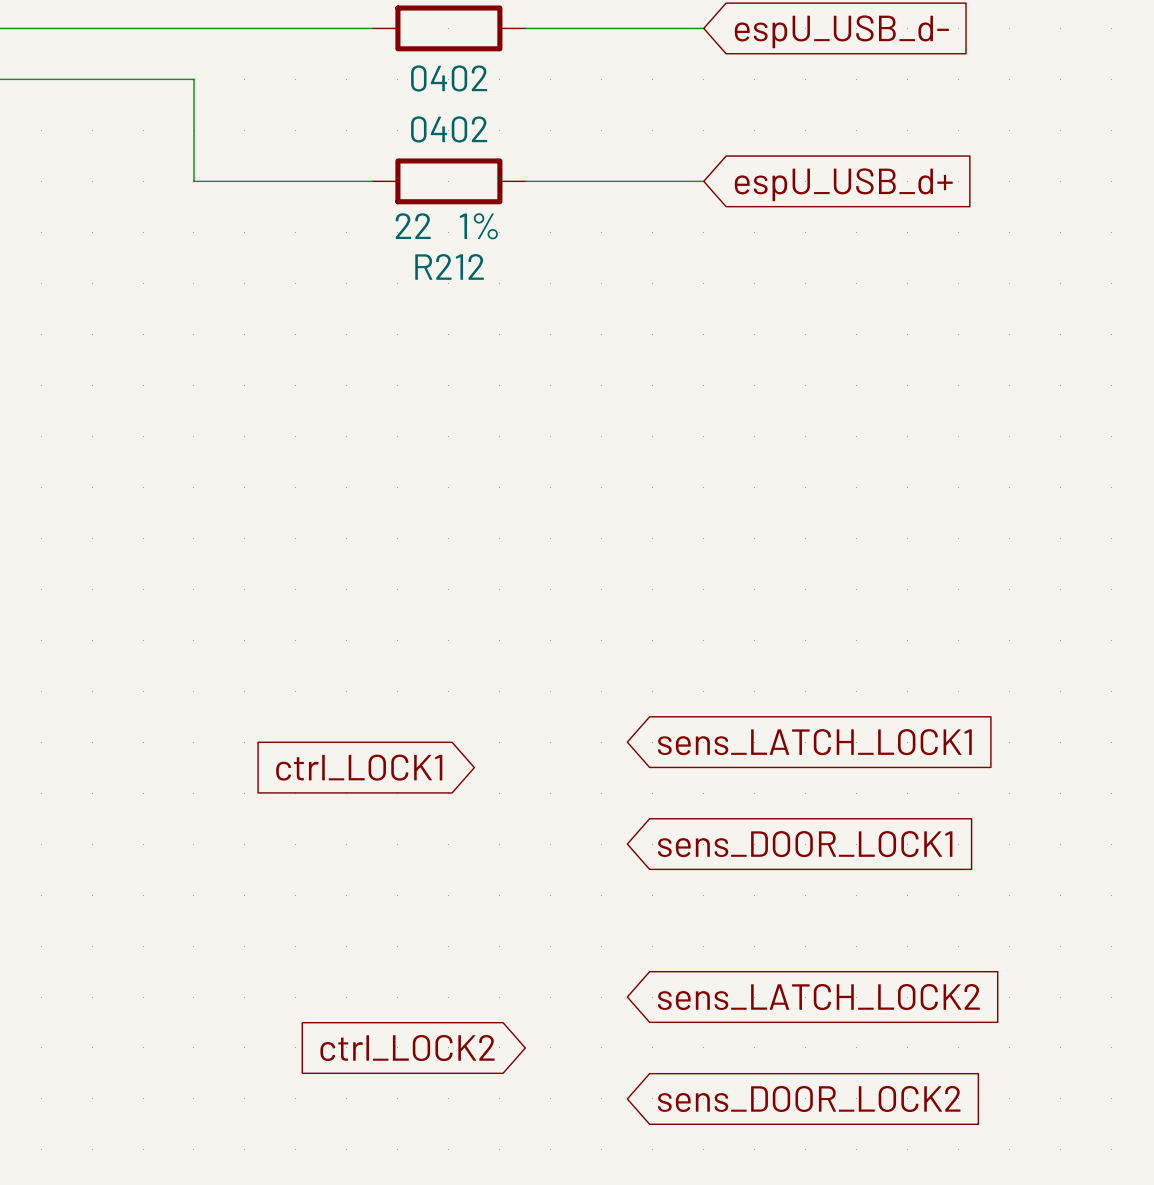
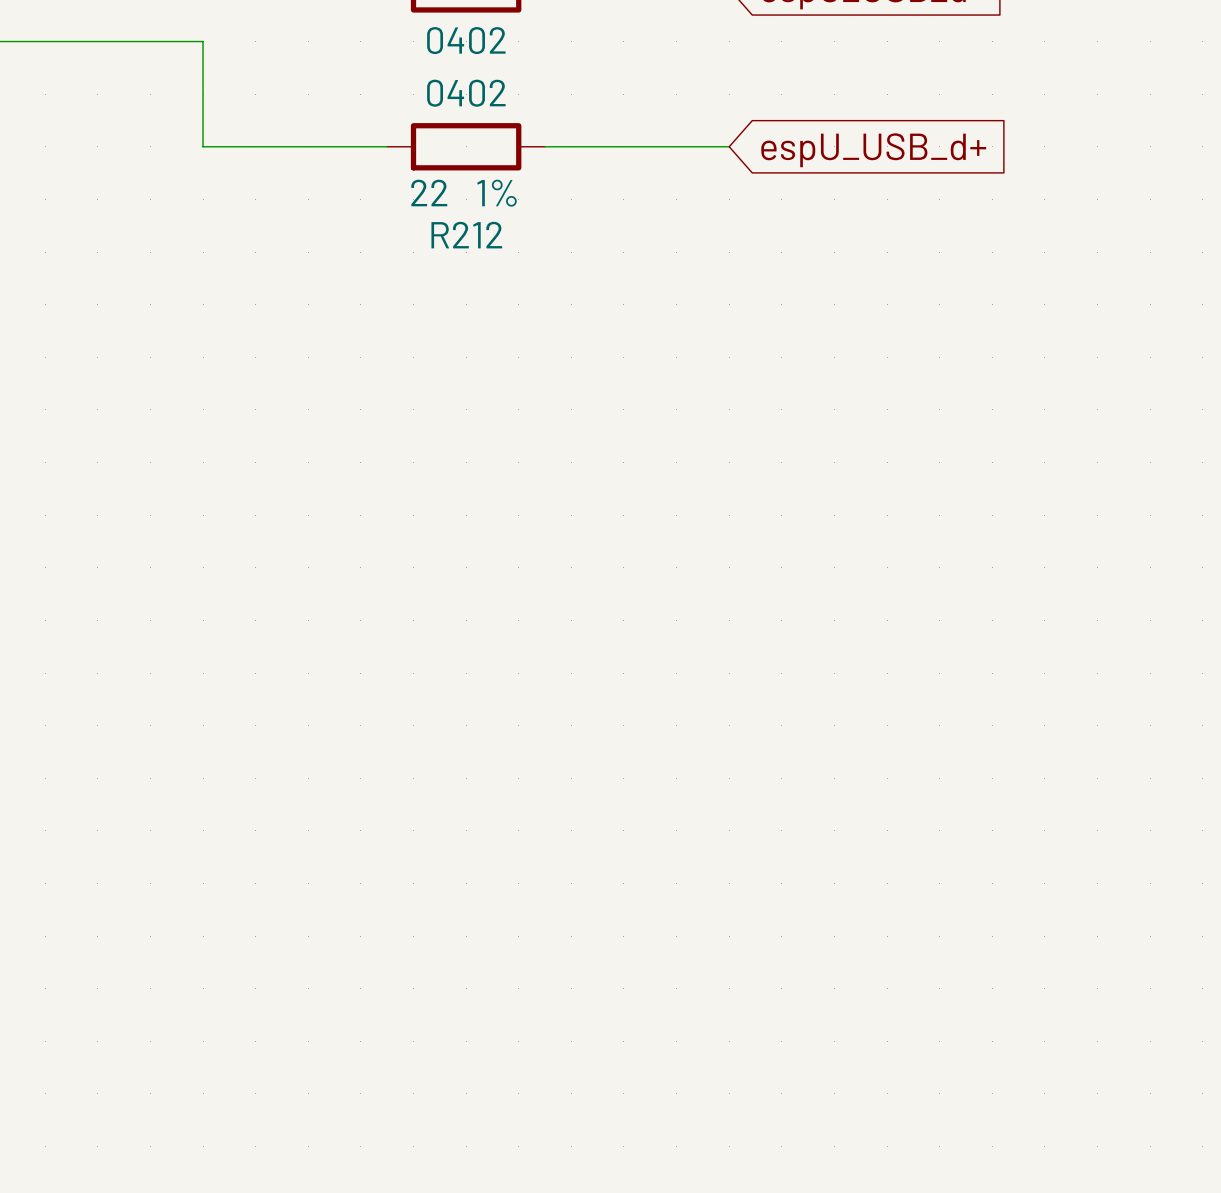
global label: sens_LATCH_LOCK1 (814, 742) -> none
global label: ctrl_LOCK1 (359, 767) -> none
global label: sens_DOOR_LOCK1 (805, 844) -> none
global label: sens_LATCH_LOCK2 (818, 997) -> none
global label: ctrl_LOCK2 (407, 1048) -> none
global label: sens_DOOR_LOCK2 (809, 1098) -> none

